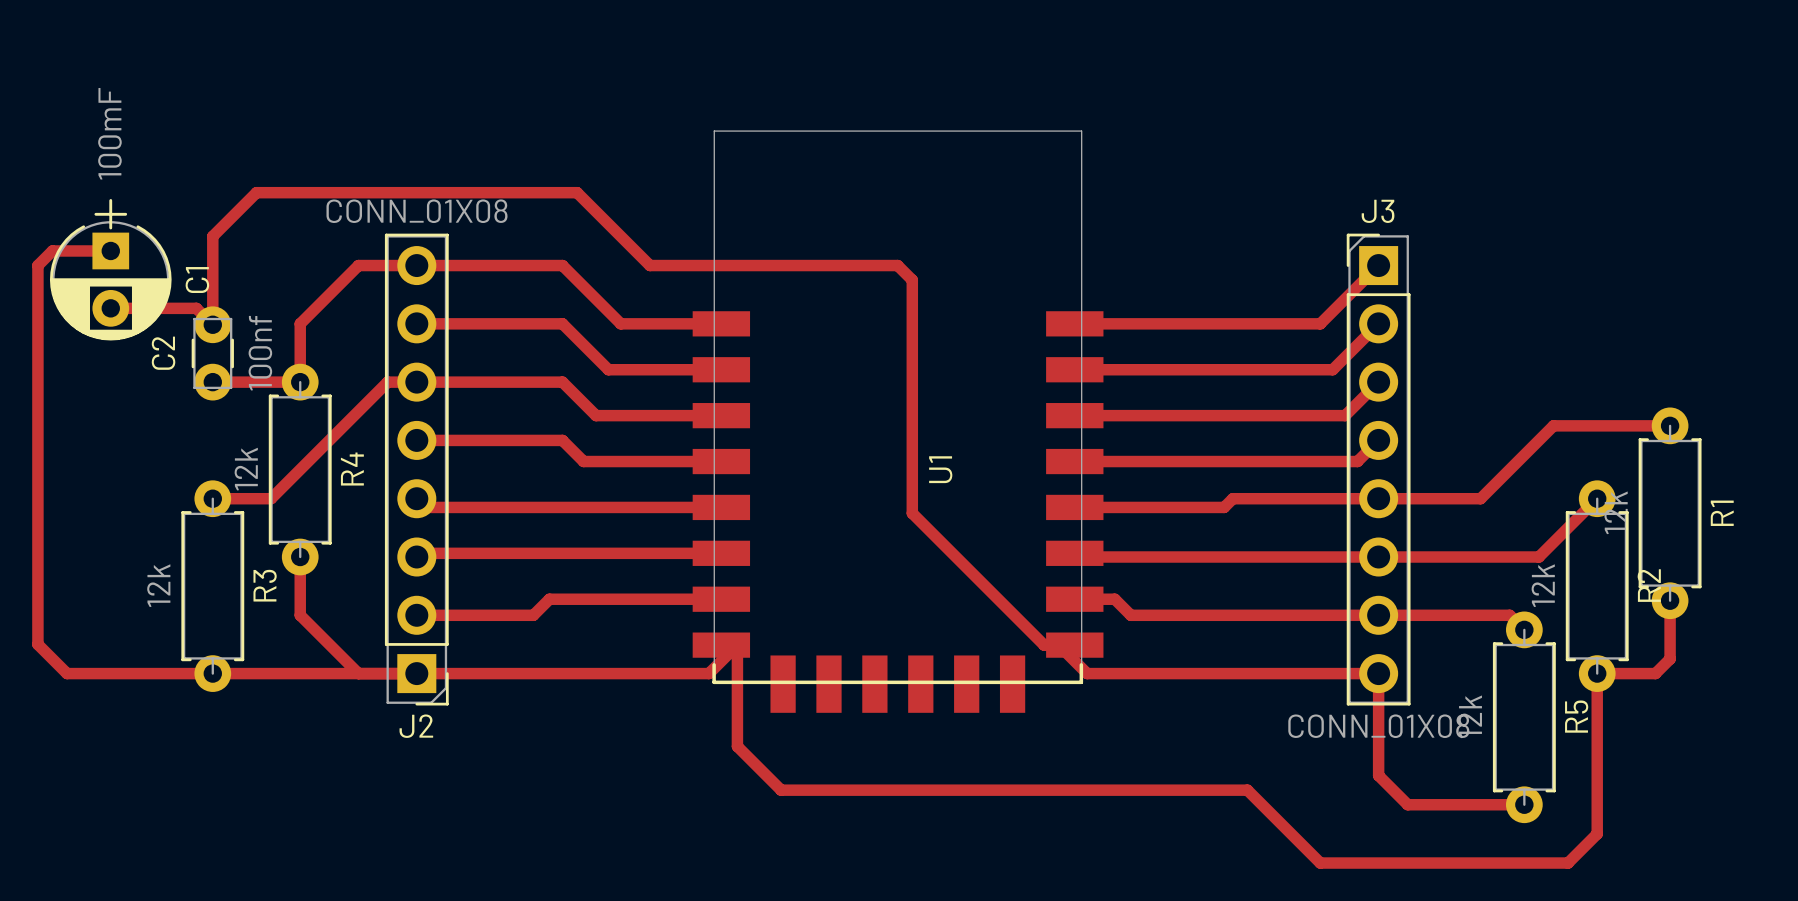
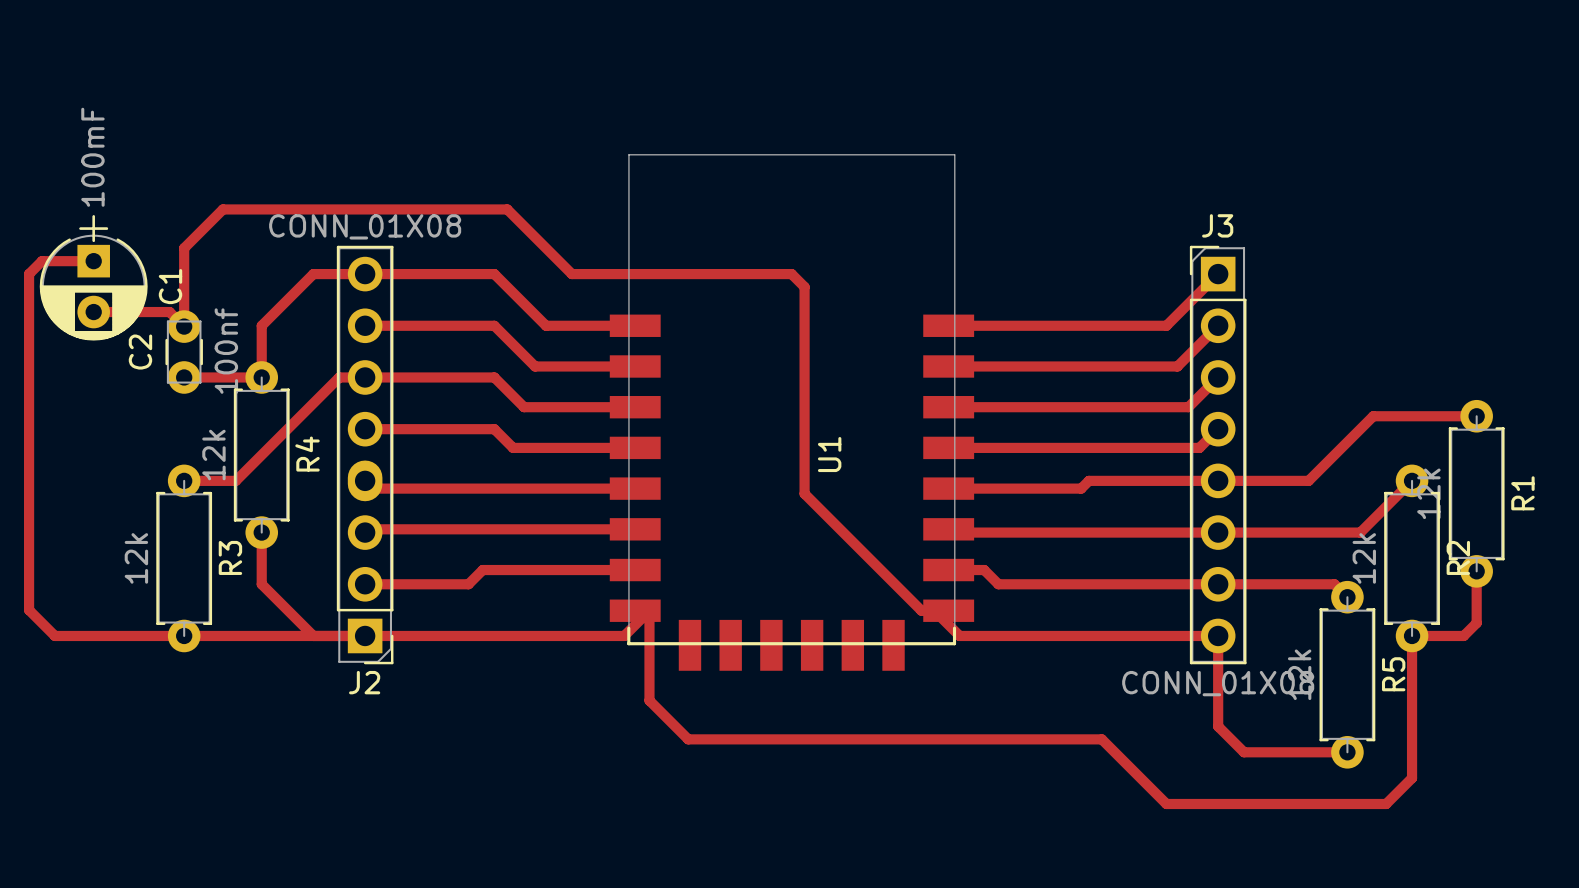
J2 footprint: [384, 233, 449, 706] -> [336, 245, 394, 665]

